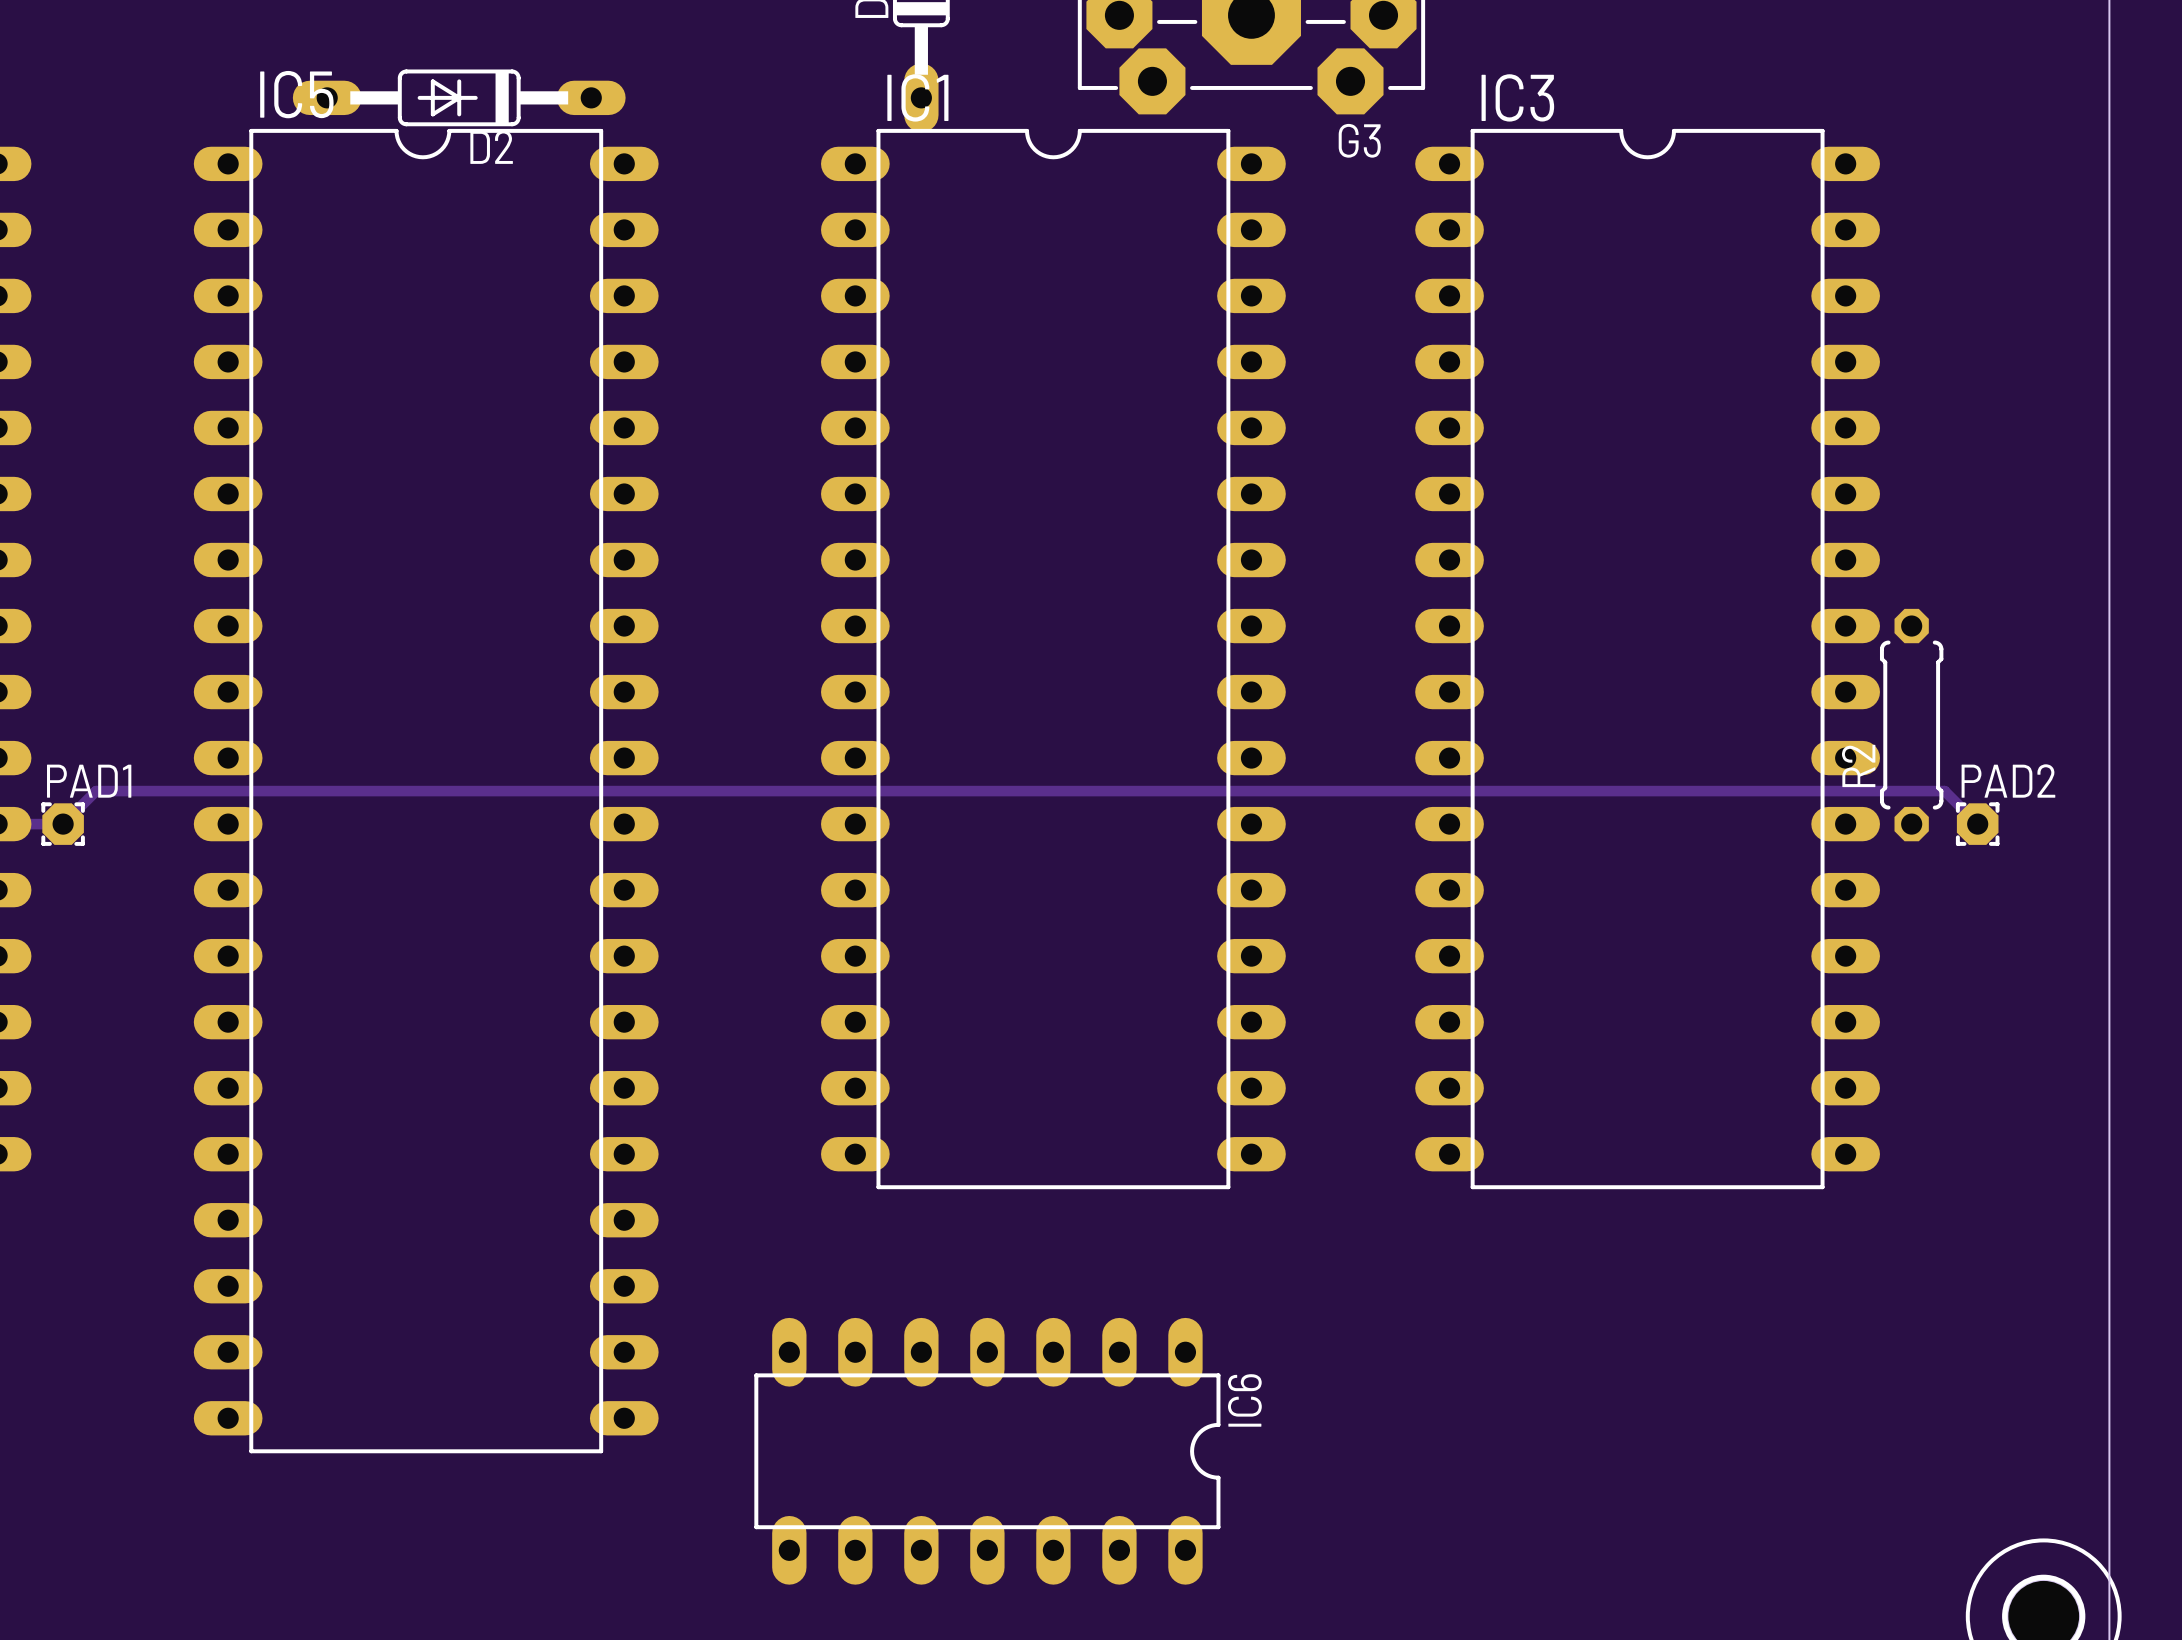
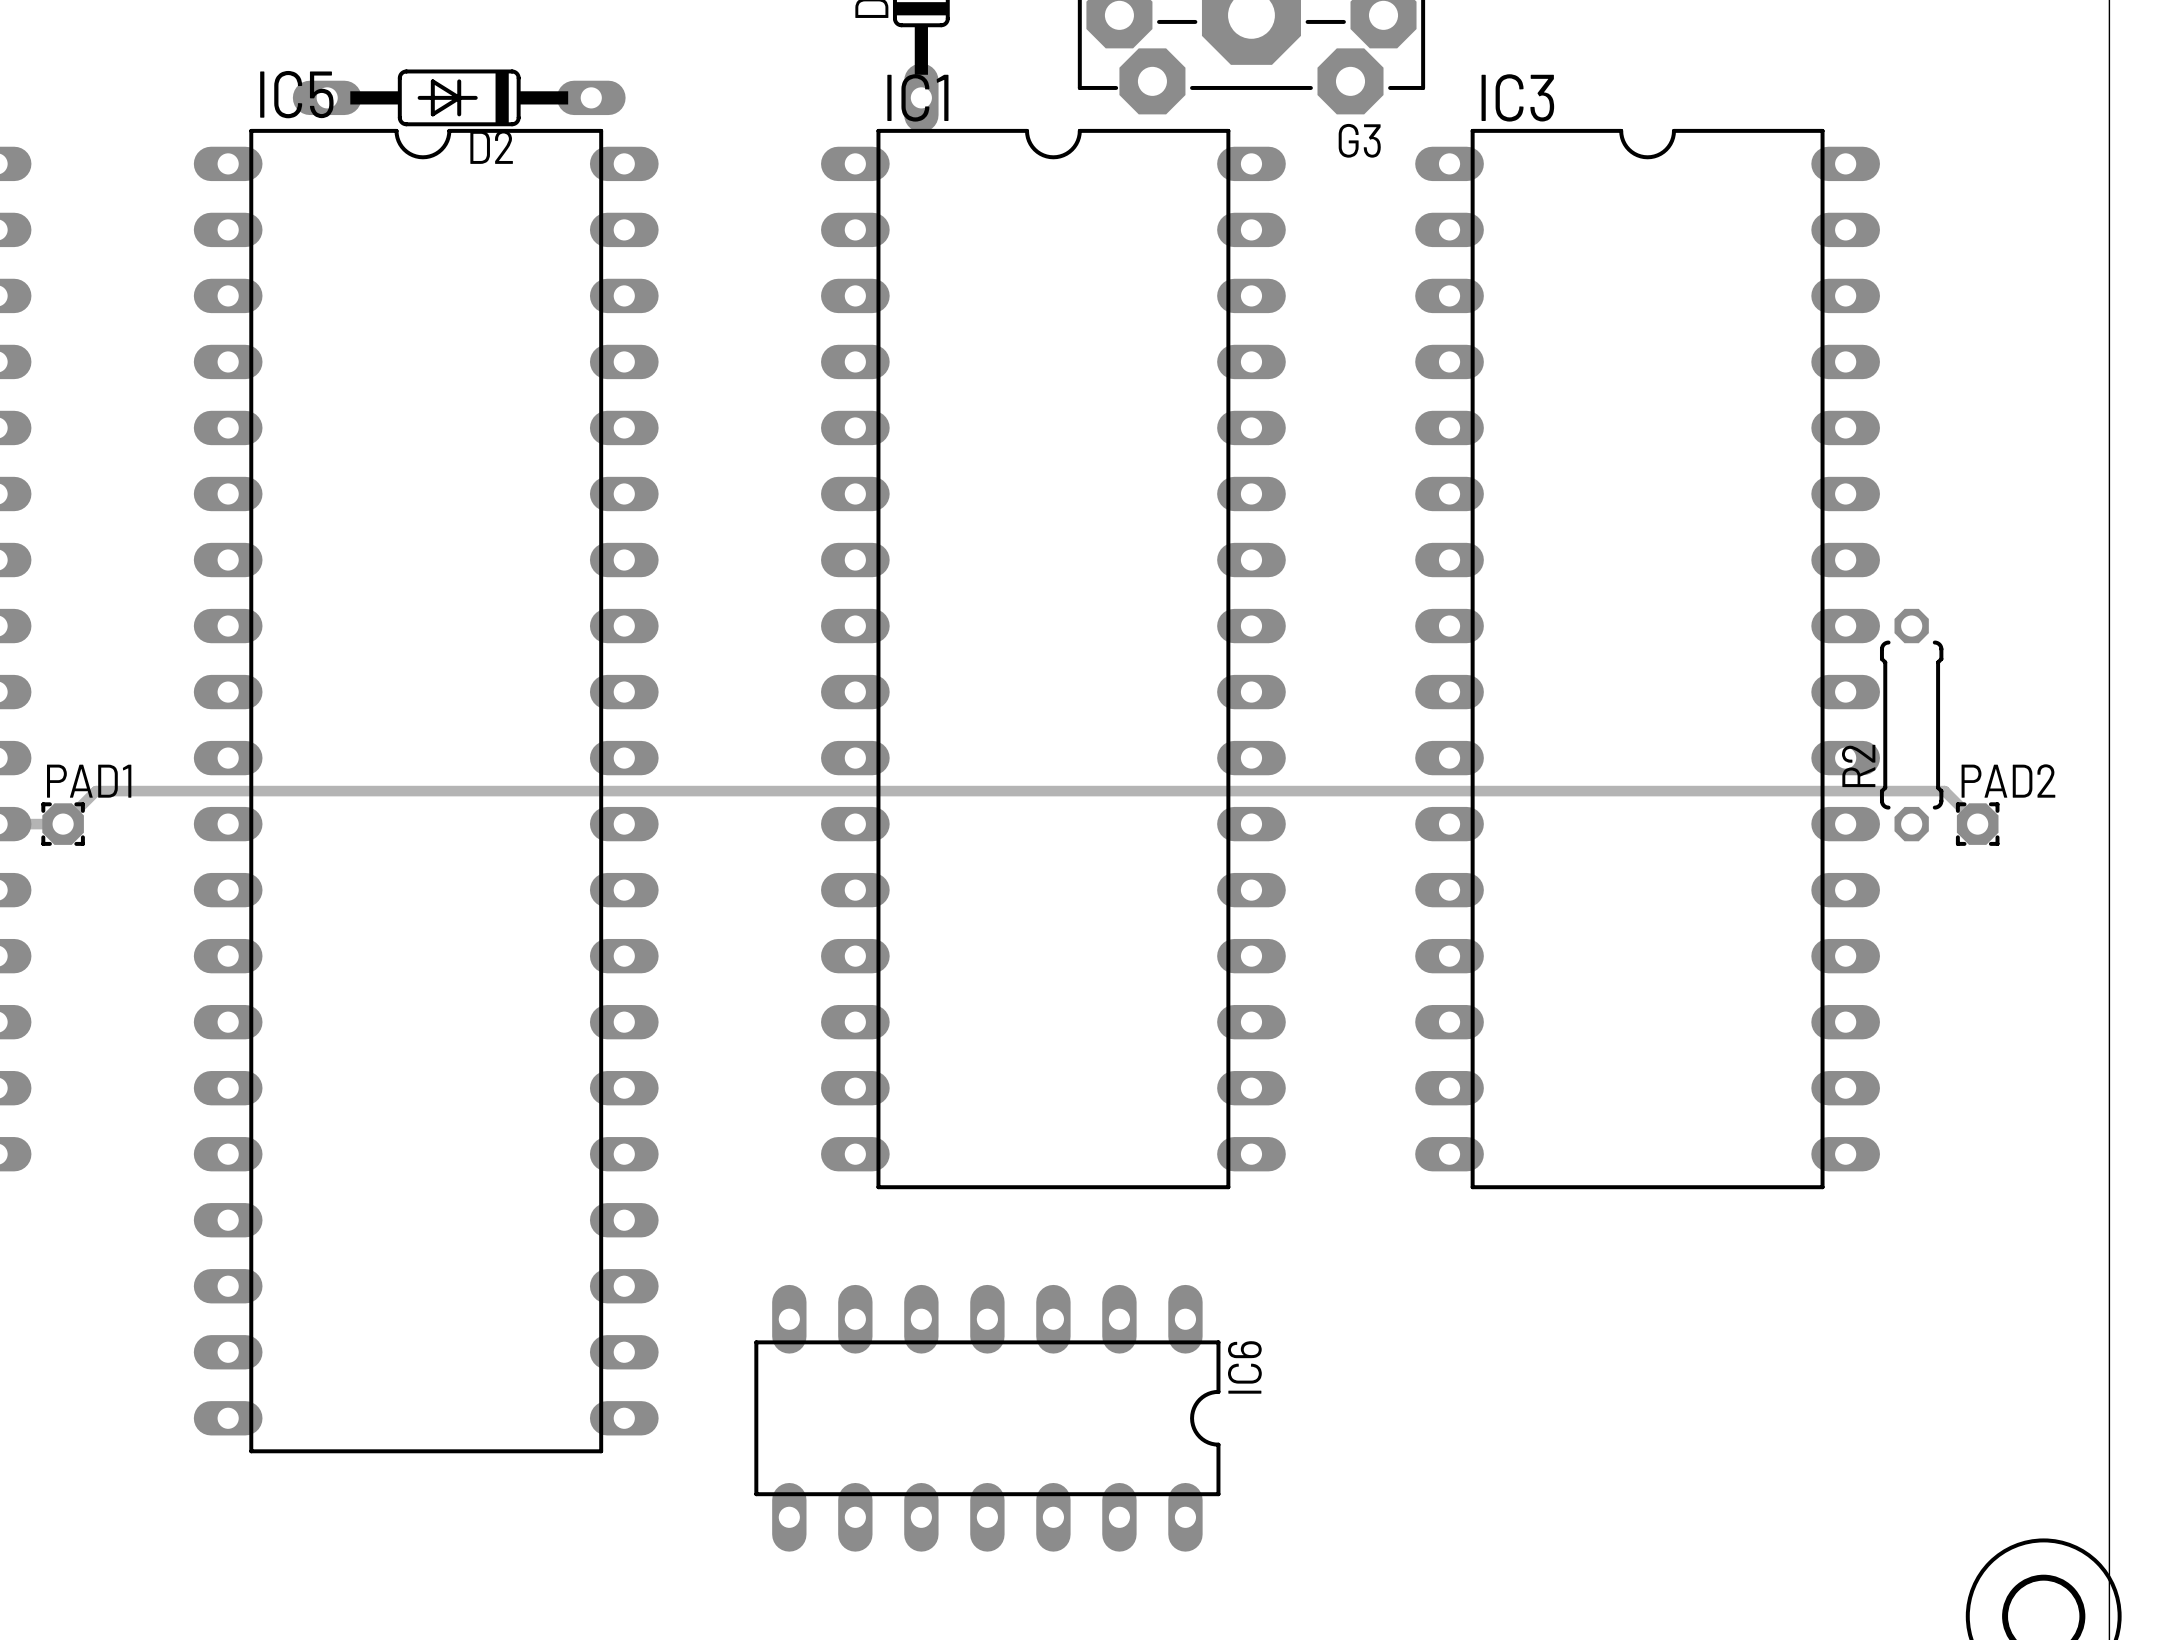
IC6 position: (987, 1451) -> (987, 1418)

